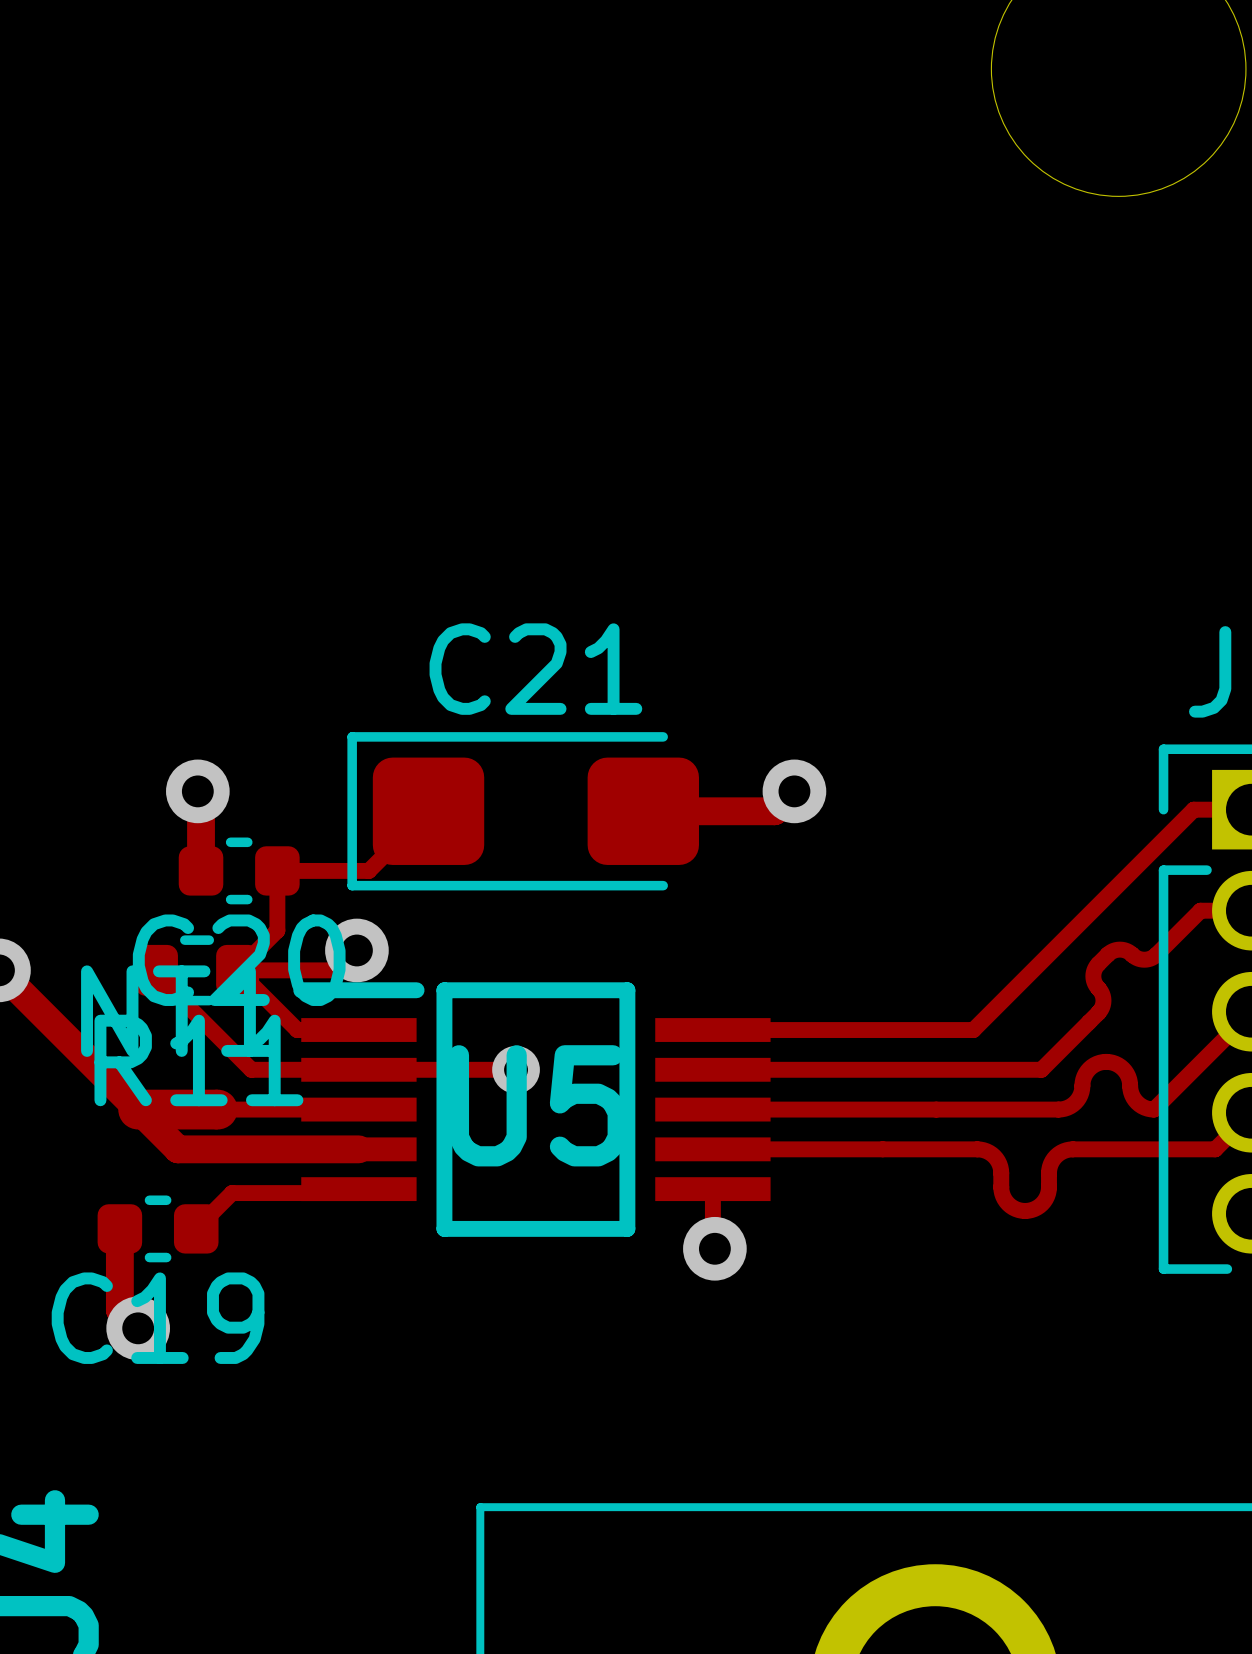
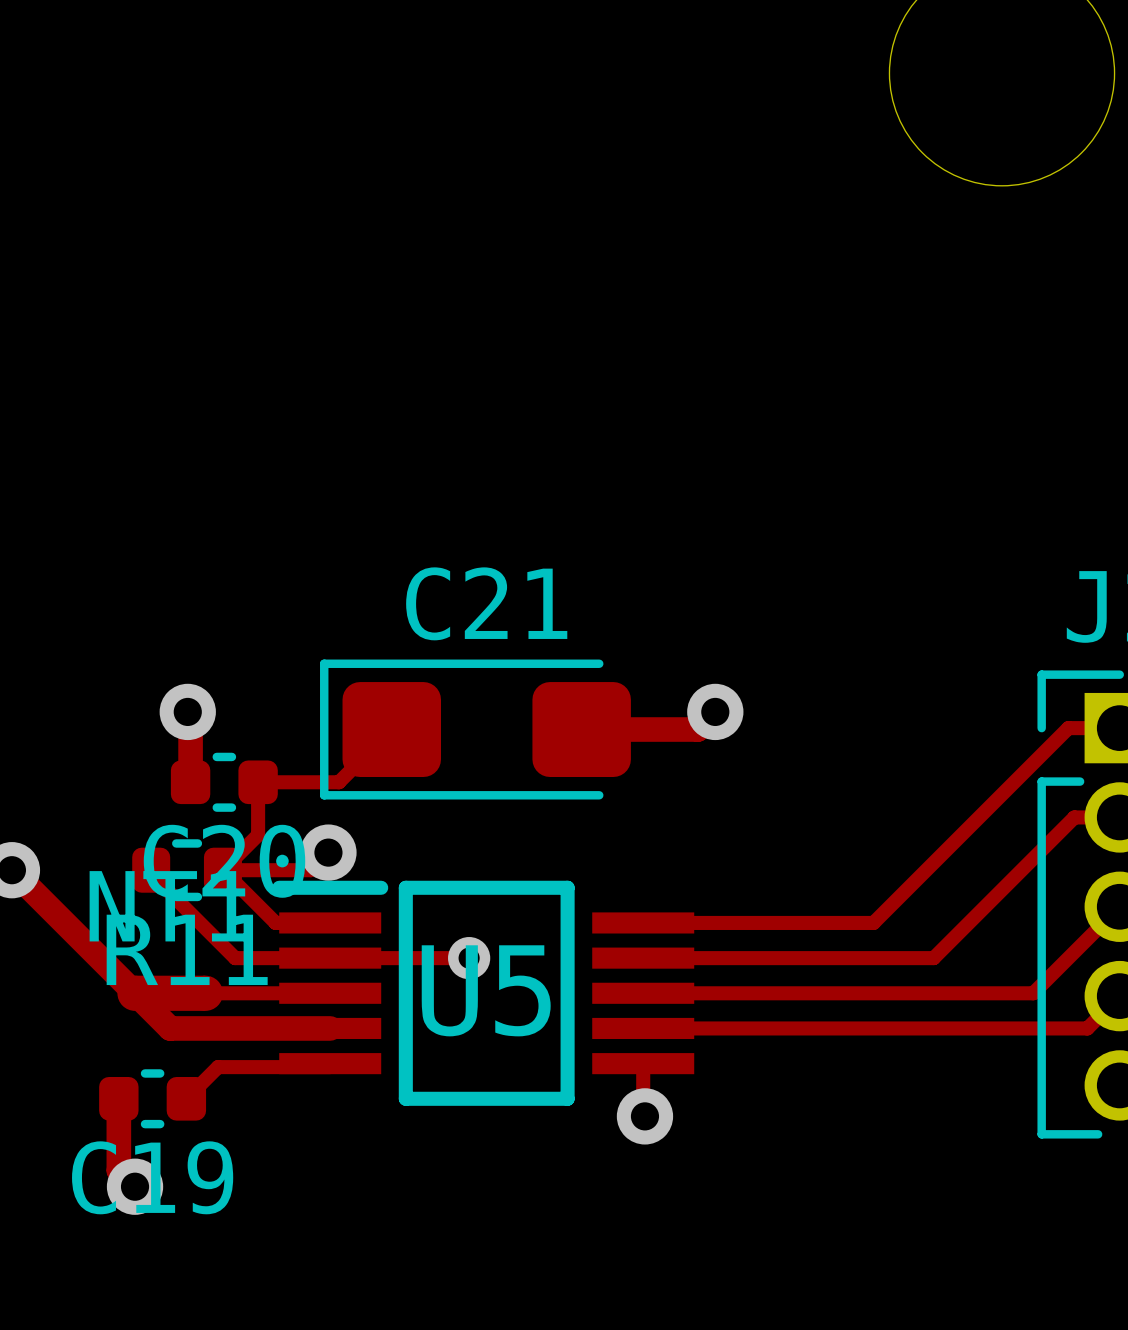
track: (1156, 954) (1144, 959) (1136, 958) (1122, 949) (1115, 950) (1107, 954) (1097, 965) (1093, 974) (1094, 981) (1103, 998) (1102, 1007) (1098, 1012) -> (1035, 856) (984, 907)
track: (1058, 1109) (1067, 1107) (1077, 1100) (1081, 1091) (1084, 1076) (1089, 1068) (1097, 1063) (1106, 1061) (1115, 1063) (1123, 1068) (1128, 1076) (1130, 1091) (1135, 1100) (1142, 1106) (1154, 1109) -> (948, 993) (1033, 993)
track: (977, 1149) (989, 1152) (998, 1161) (1001, 1170) (1002, 1193) (1006, 1201) (1013, 1207) (1025, 1210) (1037, 1207) (1045, 1199) (1048, 1190) (1049, 1167) (1053, 1158) (1063, 1151) (1072, 1149) -> (877, 1028) (961, 1028)

